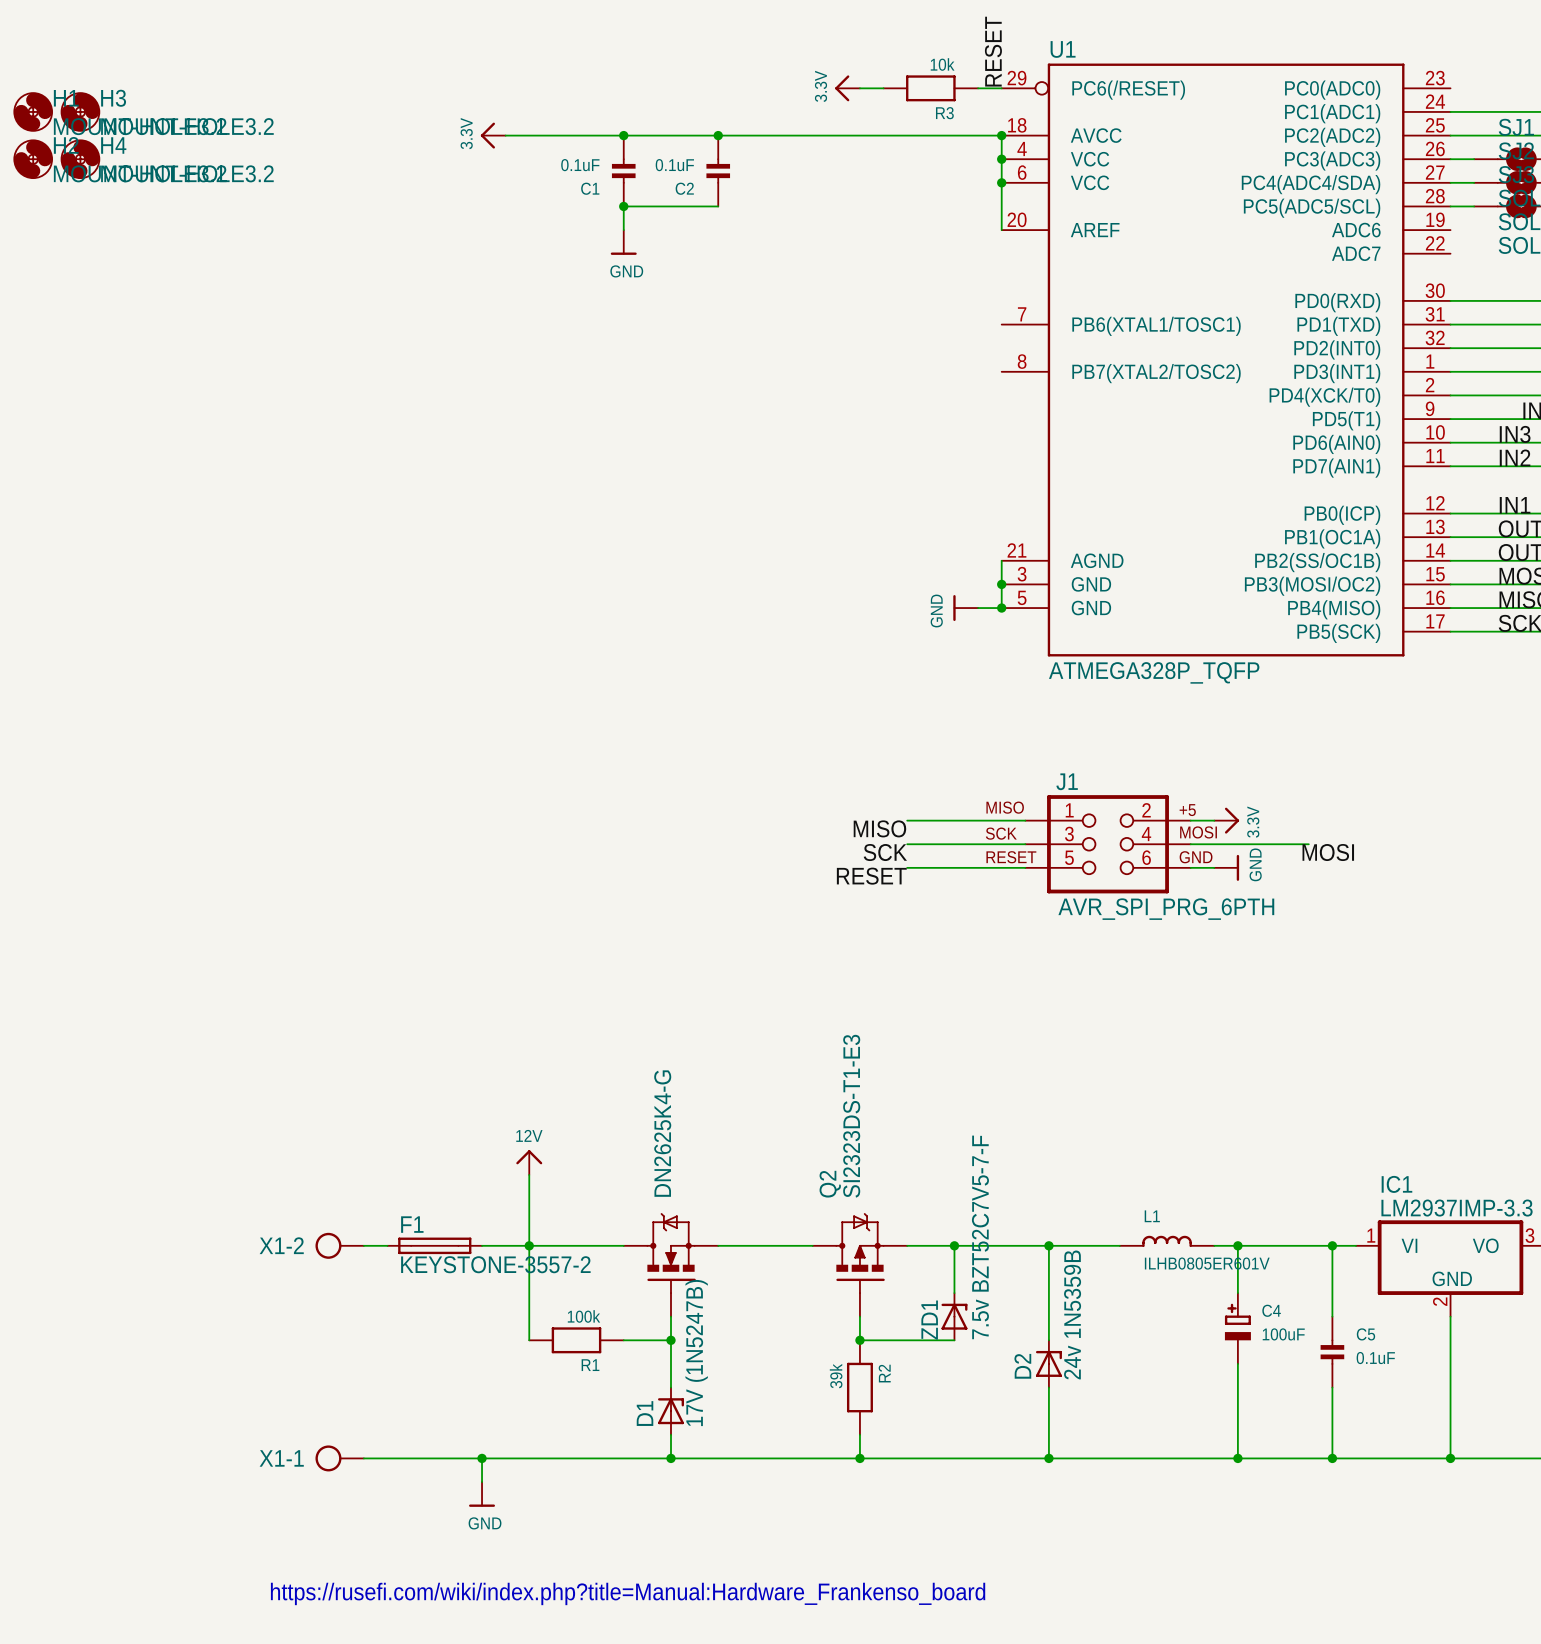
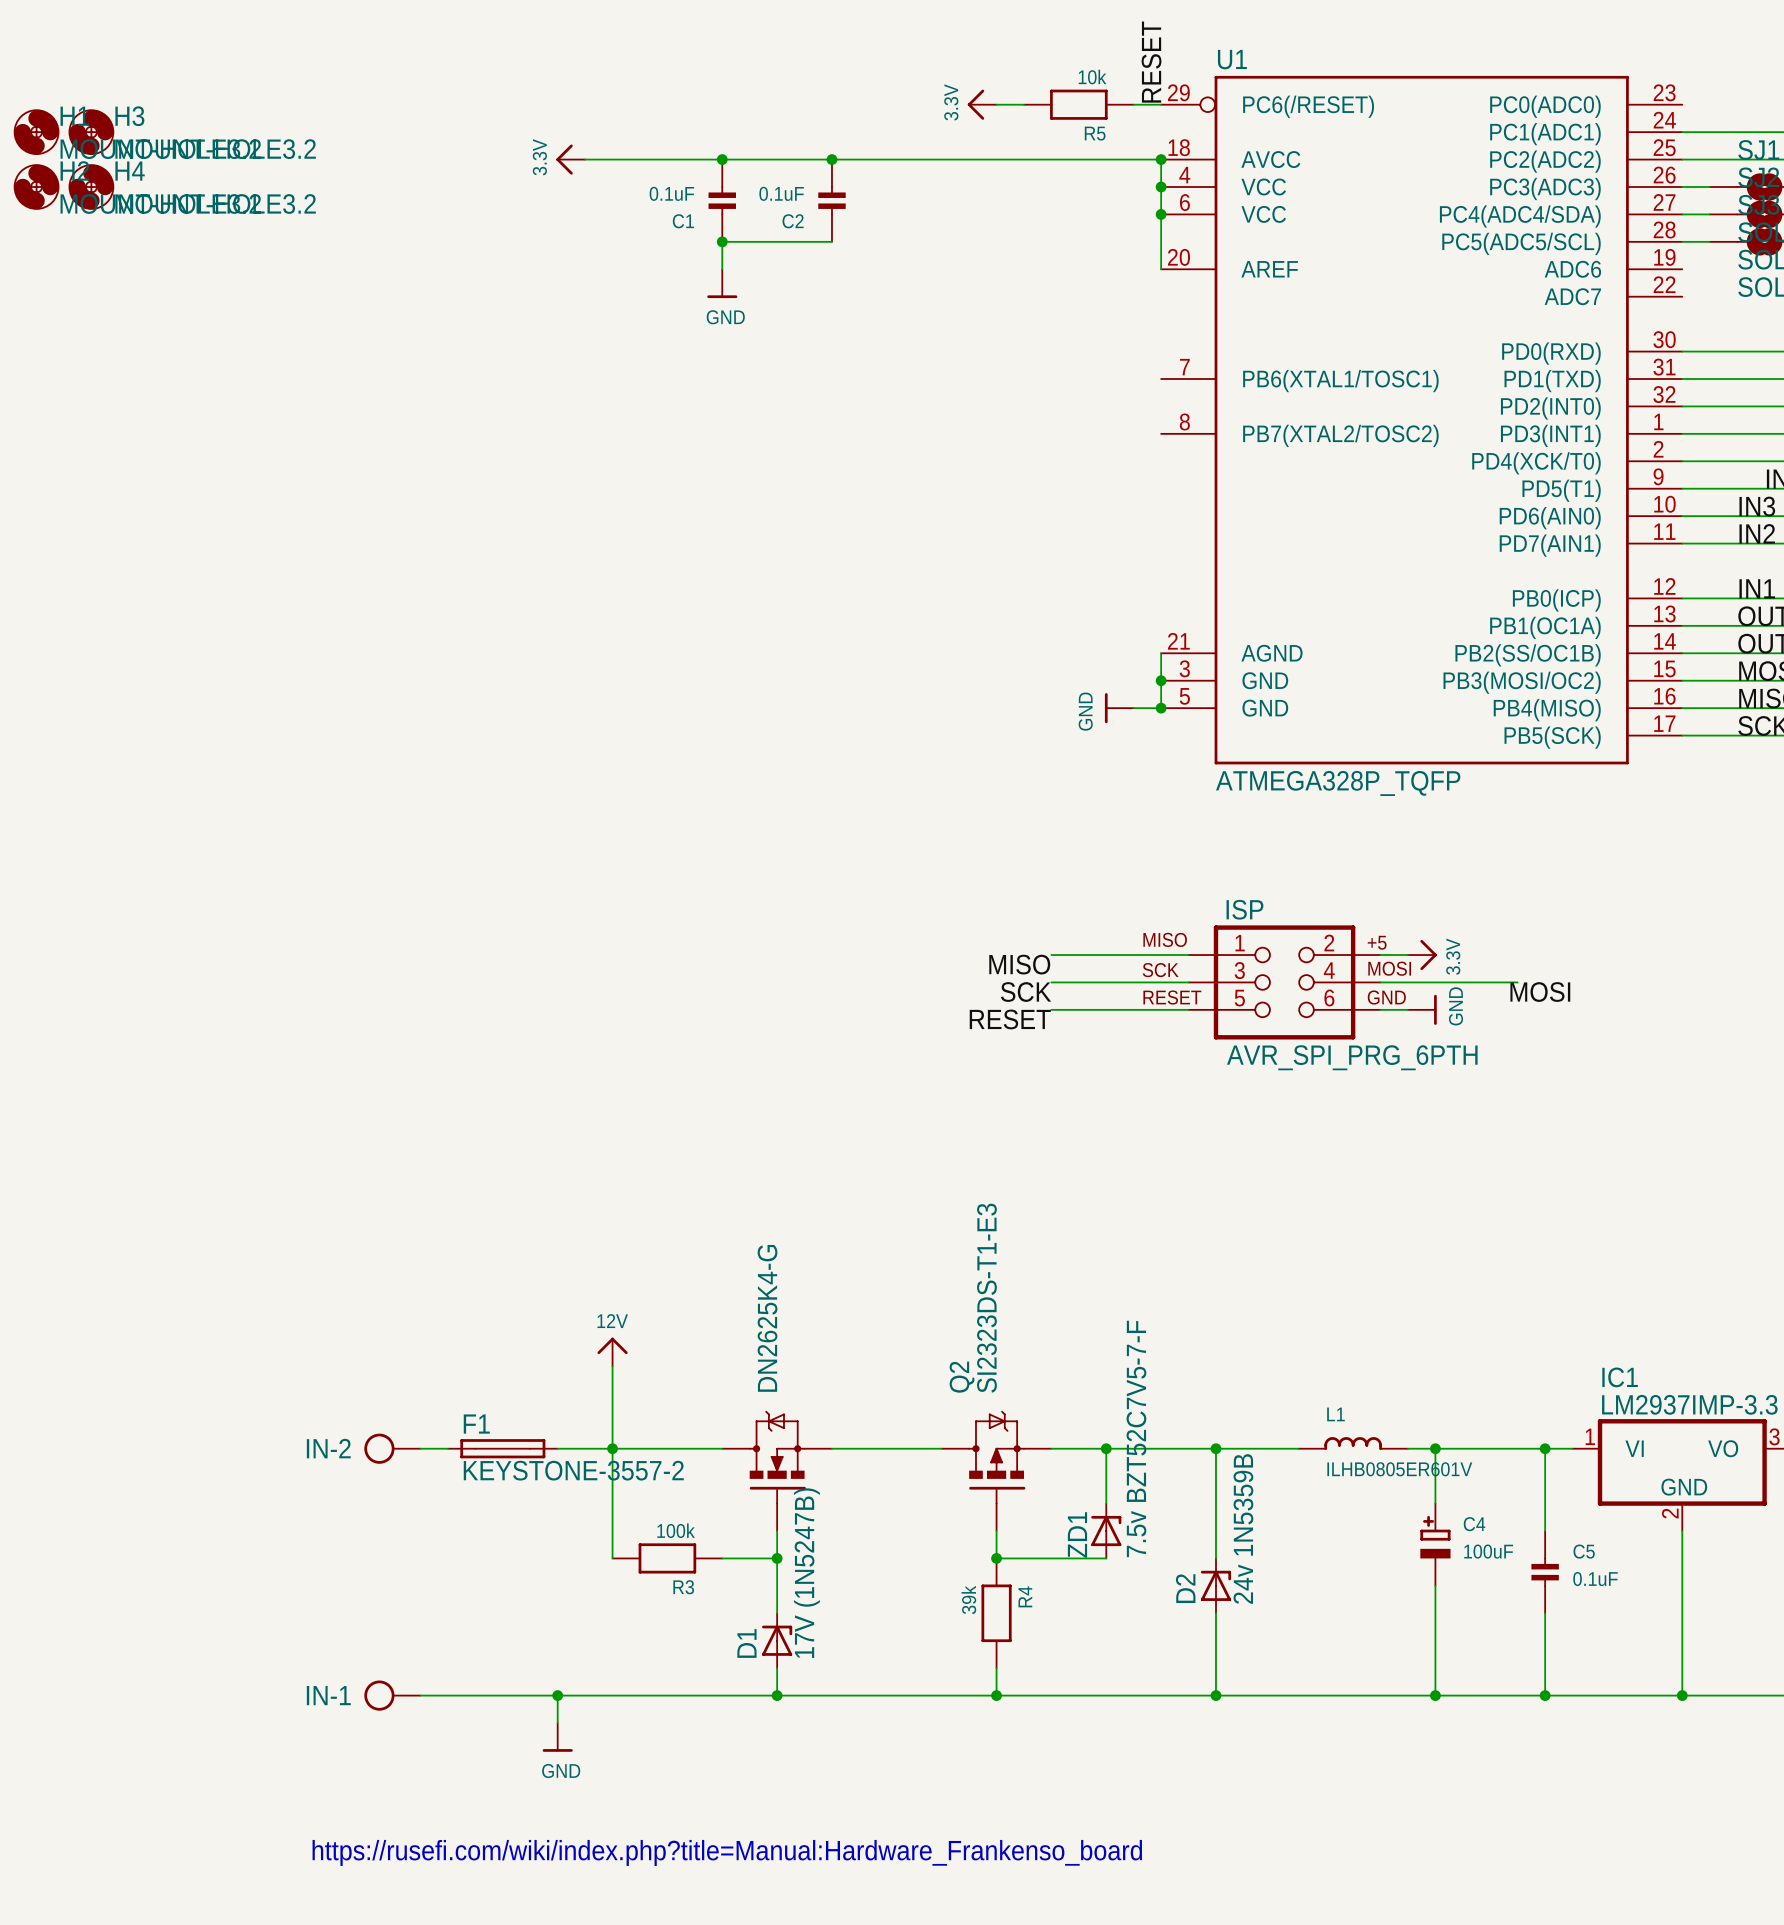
R3 name: R3 (944, 113) -> R5 (1095, 133)
J1 name: J1 (1067, 781) -> ISP (1244, 909)
X1-2 name: X1-2 (281, 1245) -> IN-2 (328, 1448)
R1 name: R1 (590, 1365) -> R3 (683, 1587)
R2 name: R2 (884, 1373) -> R4 (1025, 1596)
X1-1 name: X1-1 (281, 1458) -> IN-1 (328, 1695)

